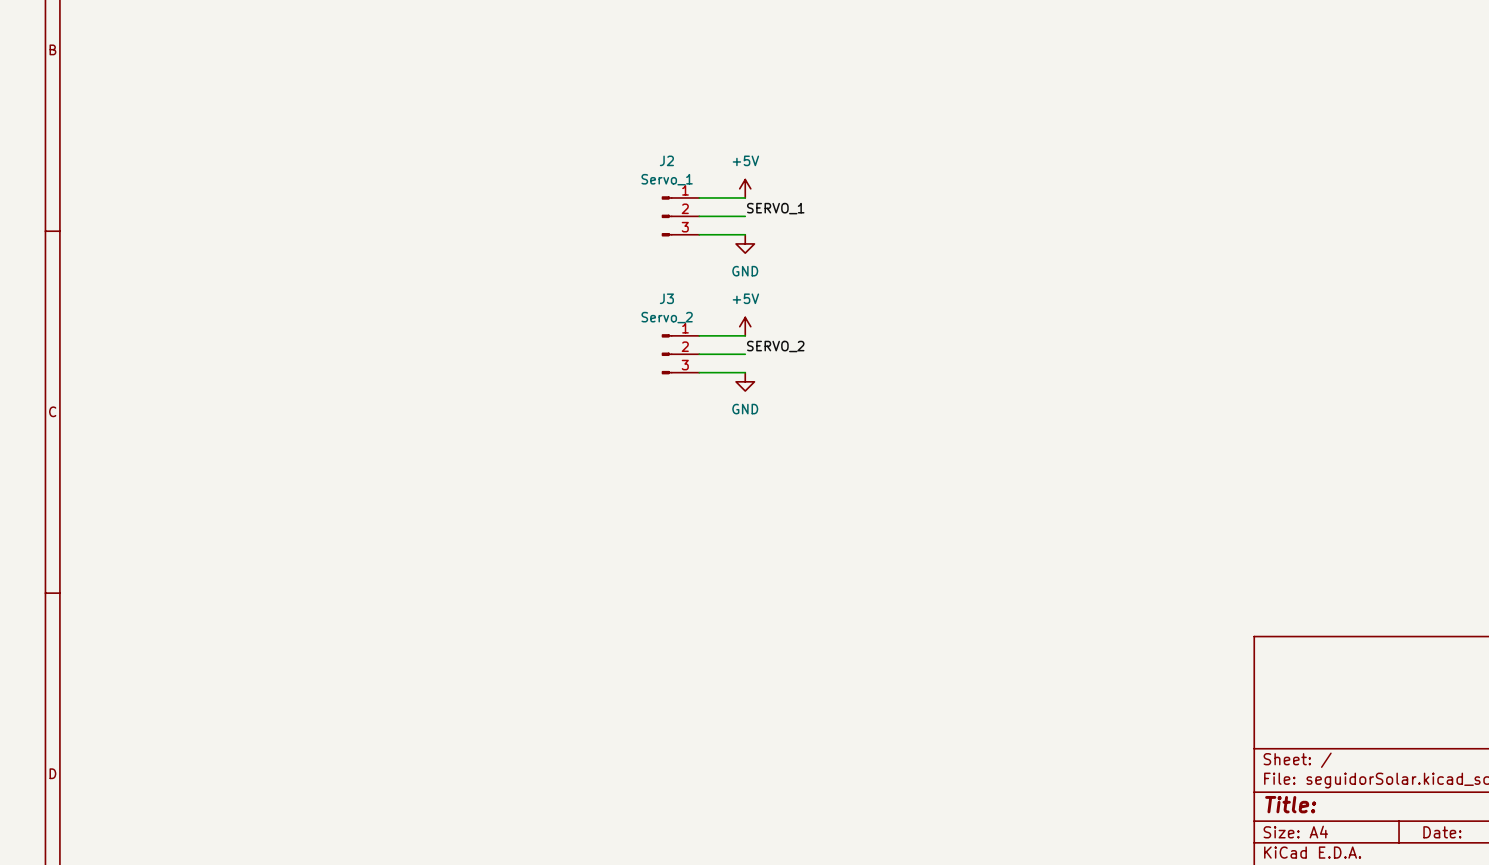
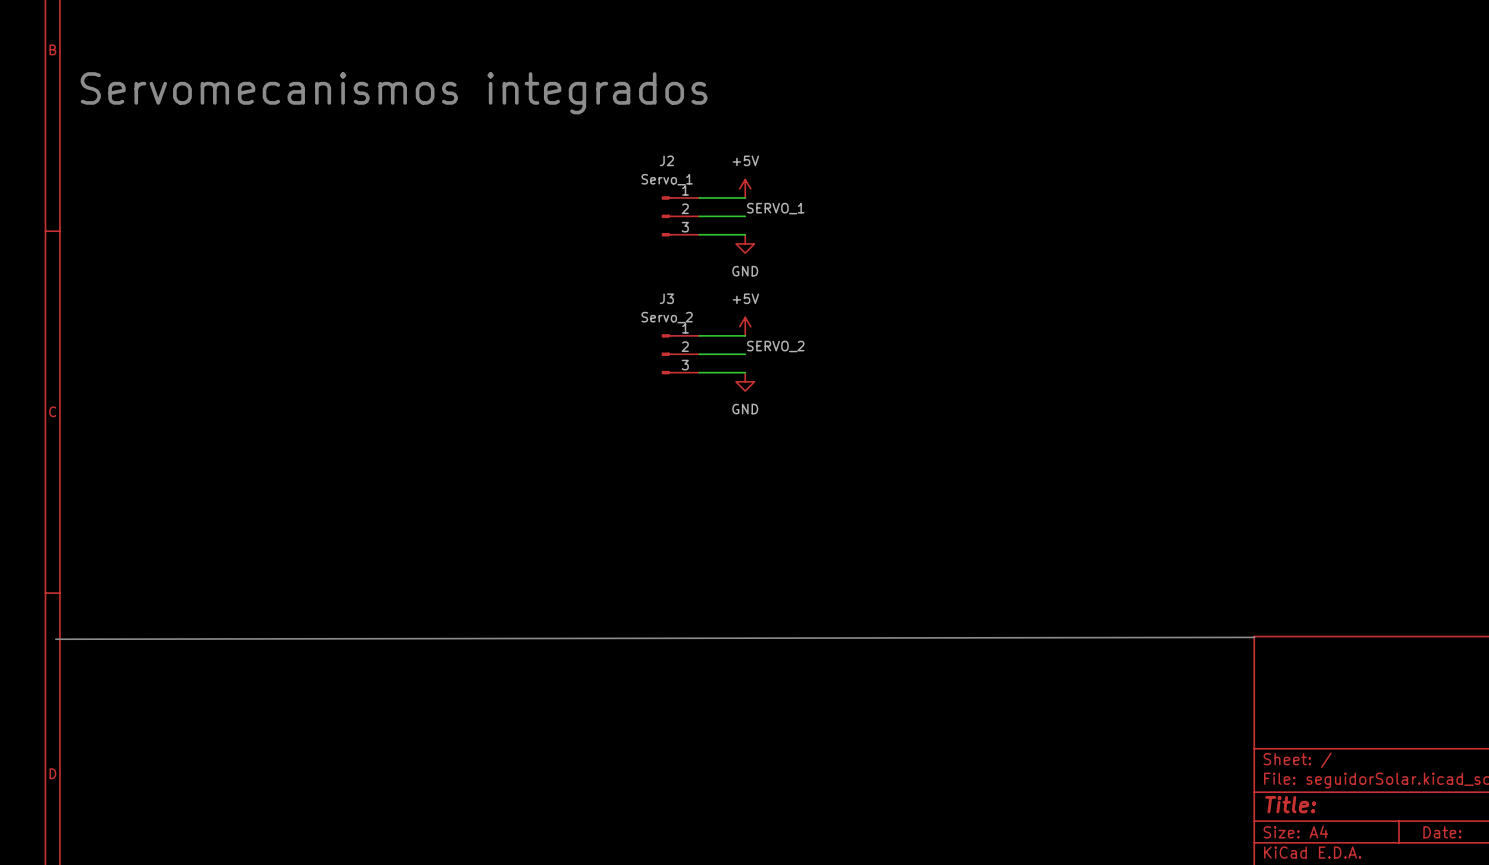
text: none -> Servomecanismos integrados (394, 93)
line: none -> (1254, 637) (55, 639)

